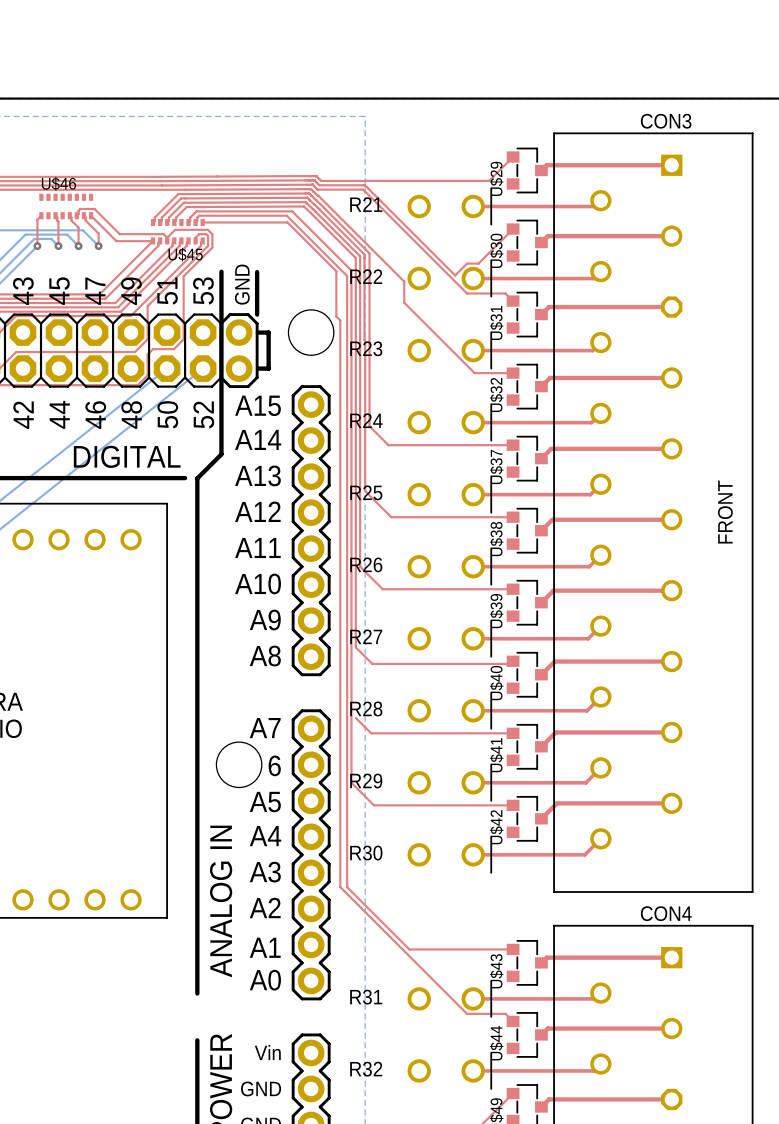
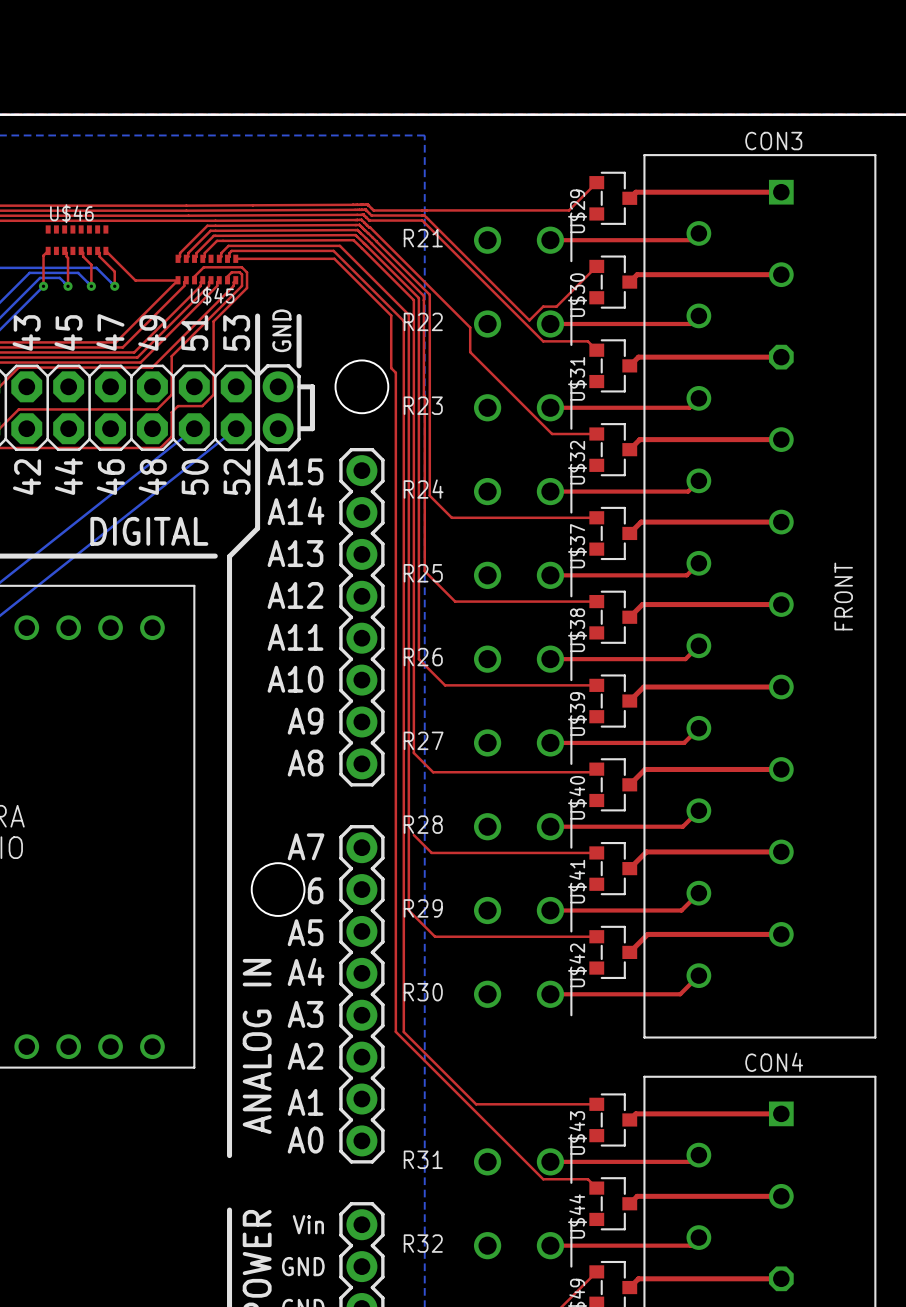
top track: (76, 215) (80, 208) (94, 208) (119, 234) (163, 234) (167, 237) -> none

